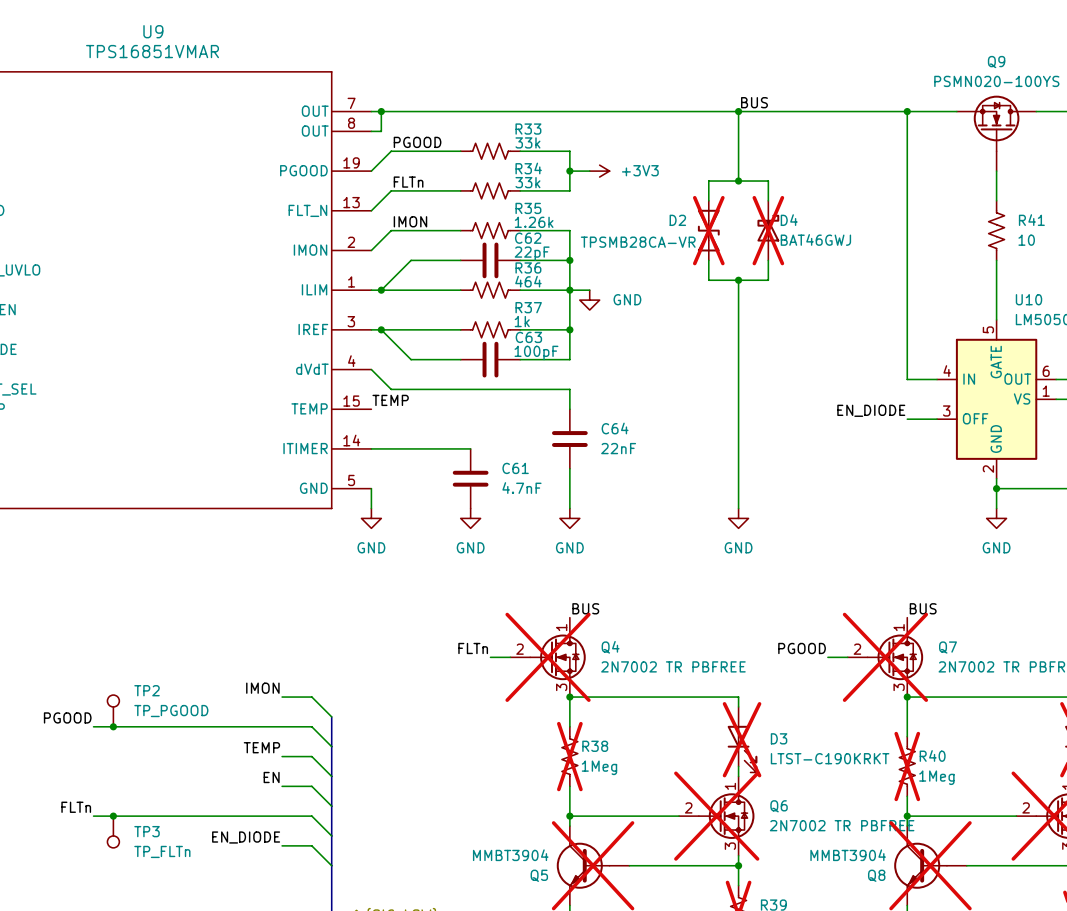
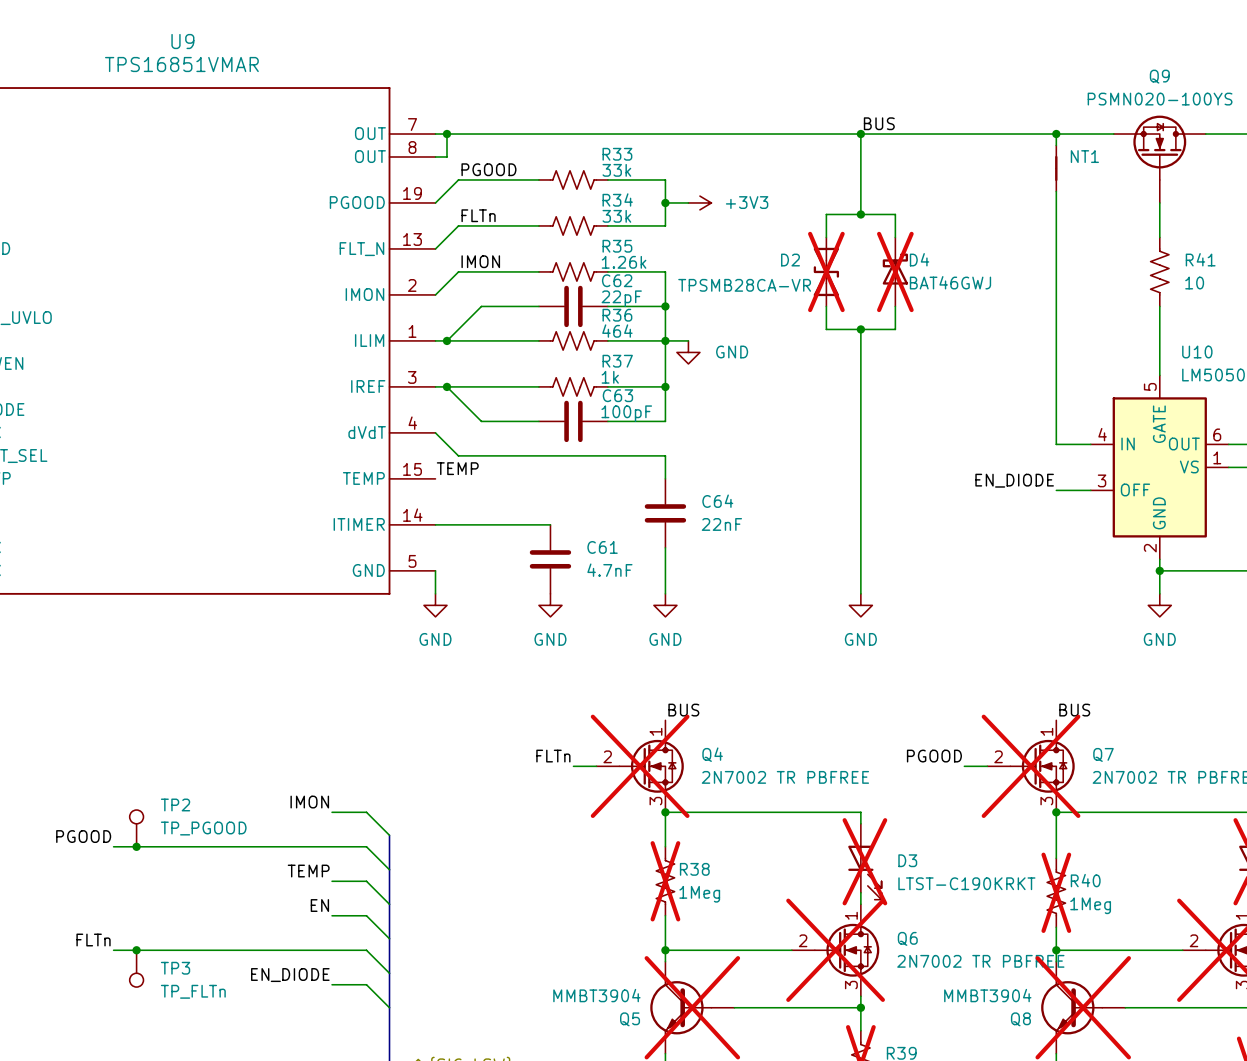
NT1: none -> (1056, 168)

